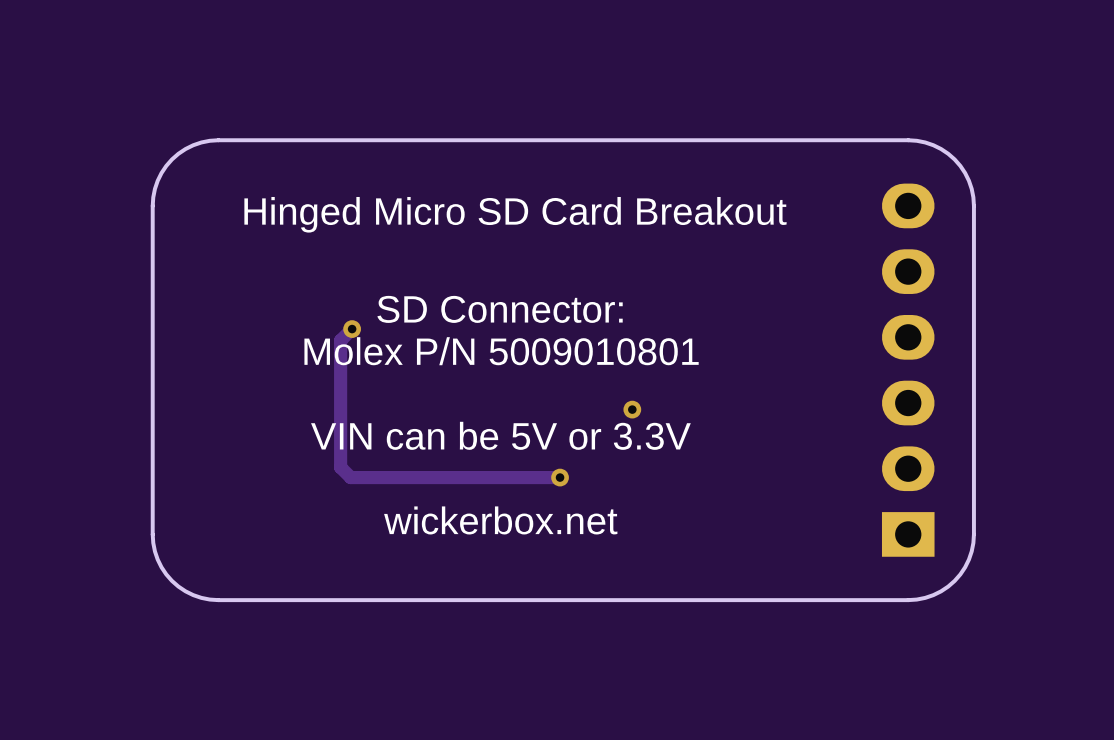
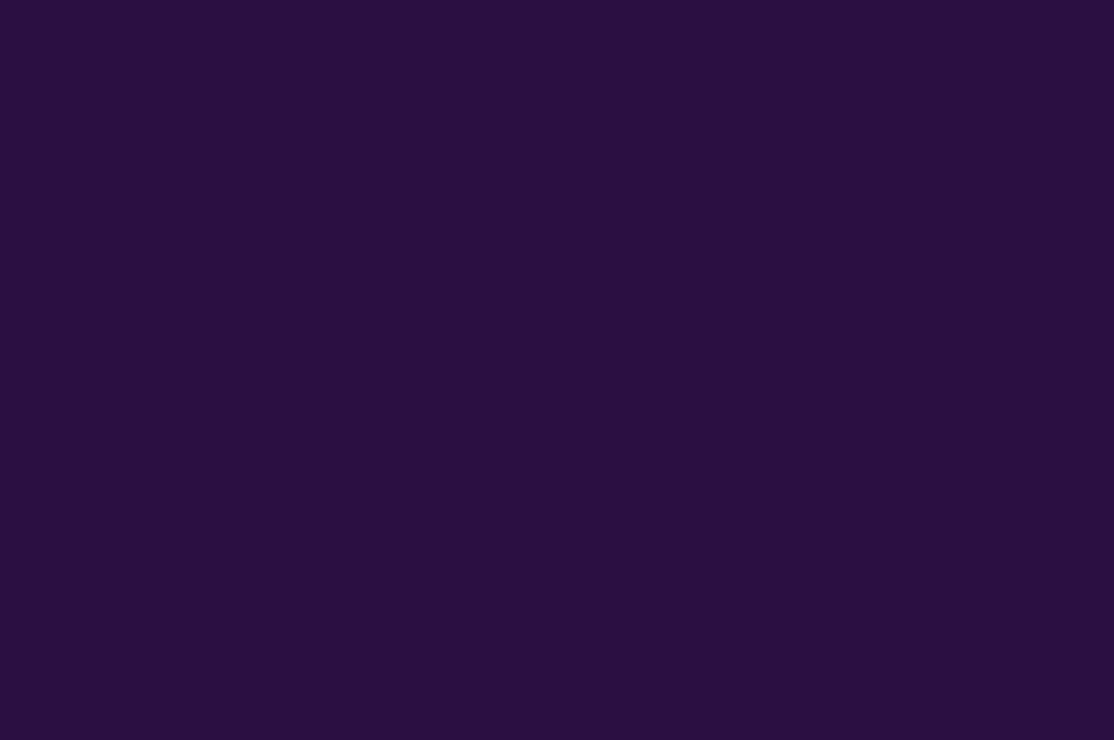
board edge: (908, 140) (218, 140) (201, 142) (185, 149) (171, 159) (161, 173) (154, 188) (152, 205) (152, 534) (154, 551) (161, 567) (171, 580) (185, 591) (201, 597) (218, 600) (908, 600) (925, 597) (941, 591) (960, 574) (968, 559) (973, 543) (973, 197) (968, 180) (954, 159) (933, 145) (908, 140) -> none
text: Hinged Micro SD Card Breakout (515, 214) -> none
text: SD Connector: (500, 309) -> none
track: (352, 329) (340, 340) (340, 467) (350, 477) (560, 477) -> none
via: (352, 329) -> none
text: Molex P/N 5009010801 (501, 351) -> none
part: (908, 370) -> none
via: (632, 409) -> none
text: VIN can be 5V or 3.3V (500, 435) -> none
via: (560, 477) -> none
text: wickerbox.net (500, 520) -> none

